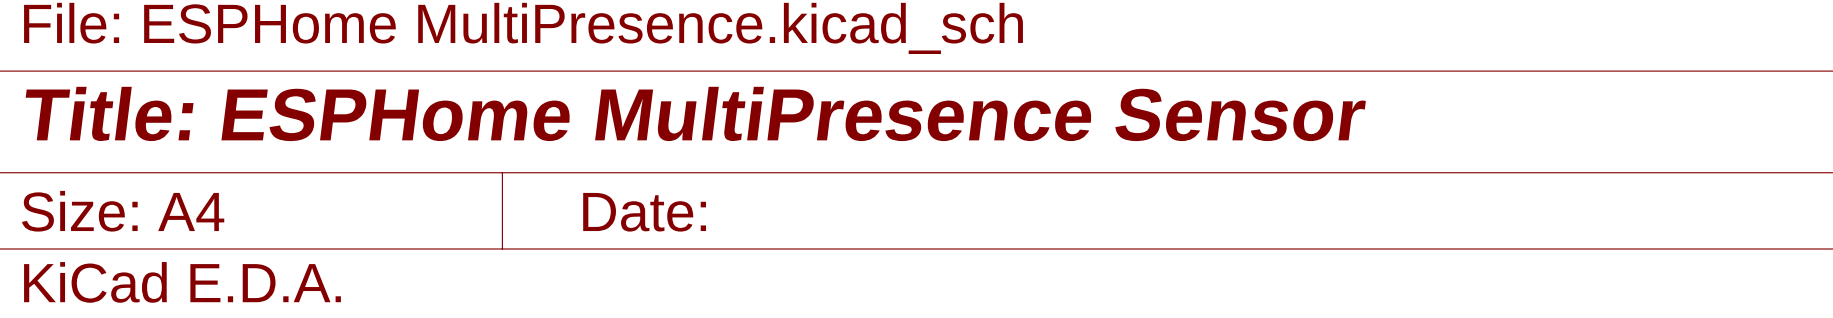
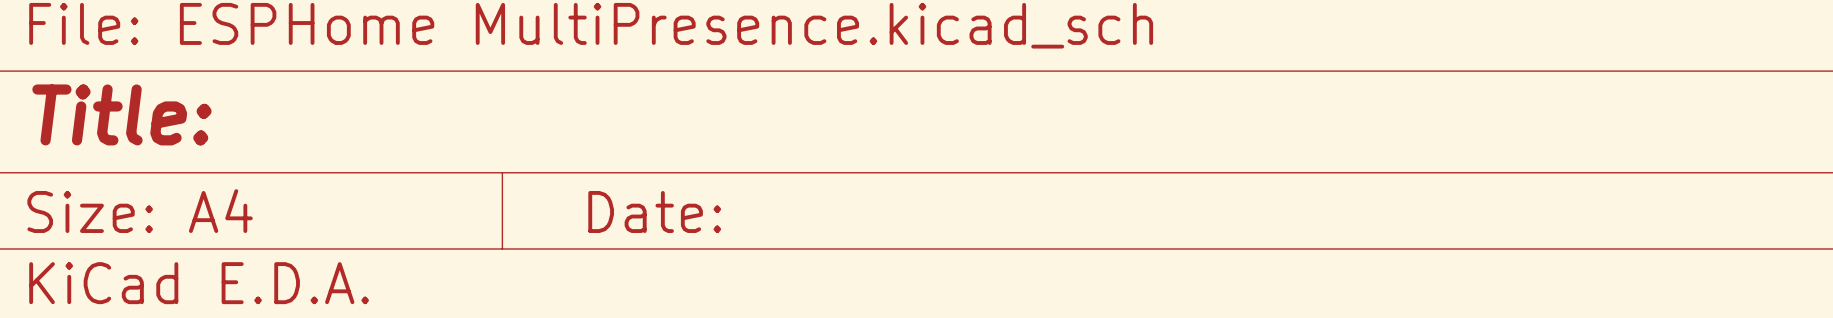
title block: Title: ESPHome MultiPresence Sensor (695, 113) -> Title: (121, 114)

